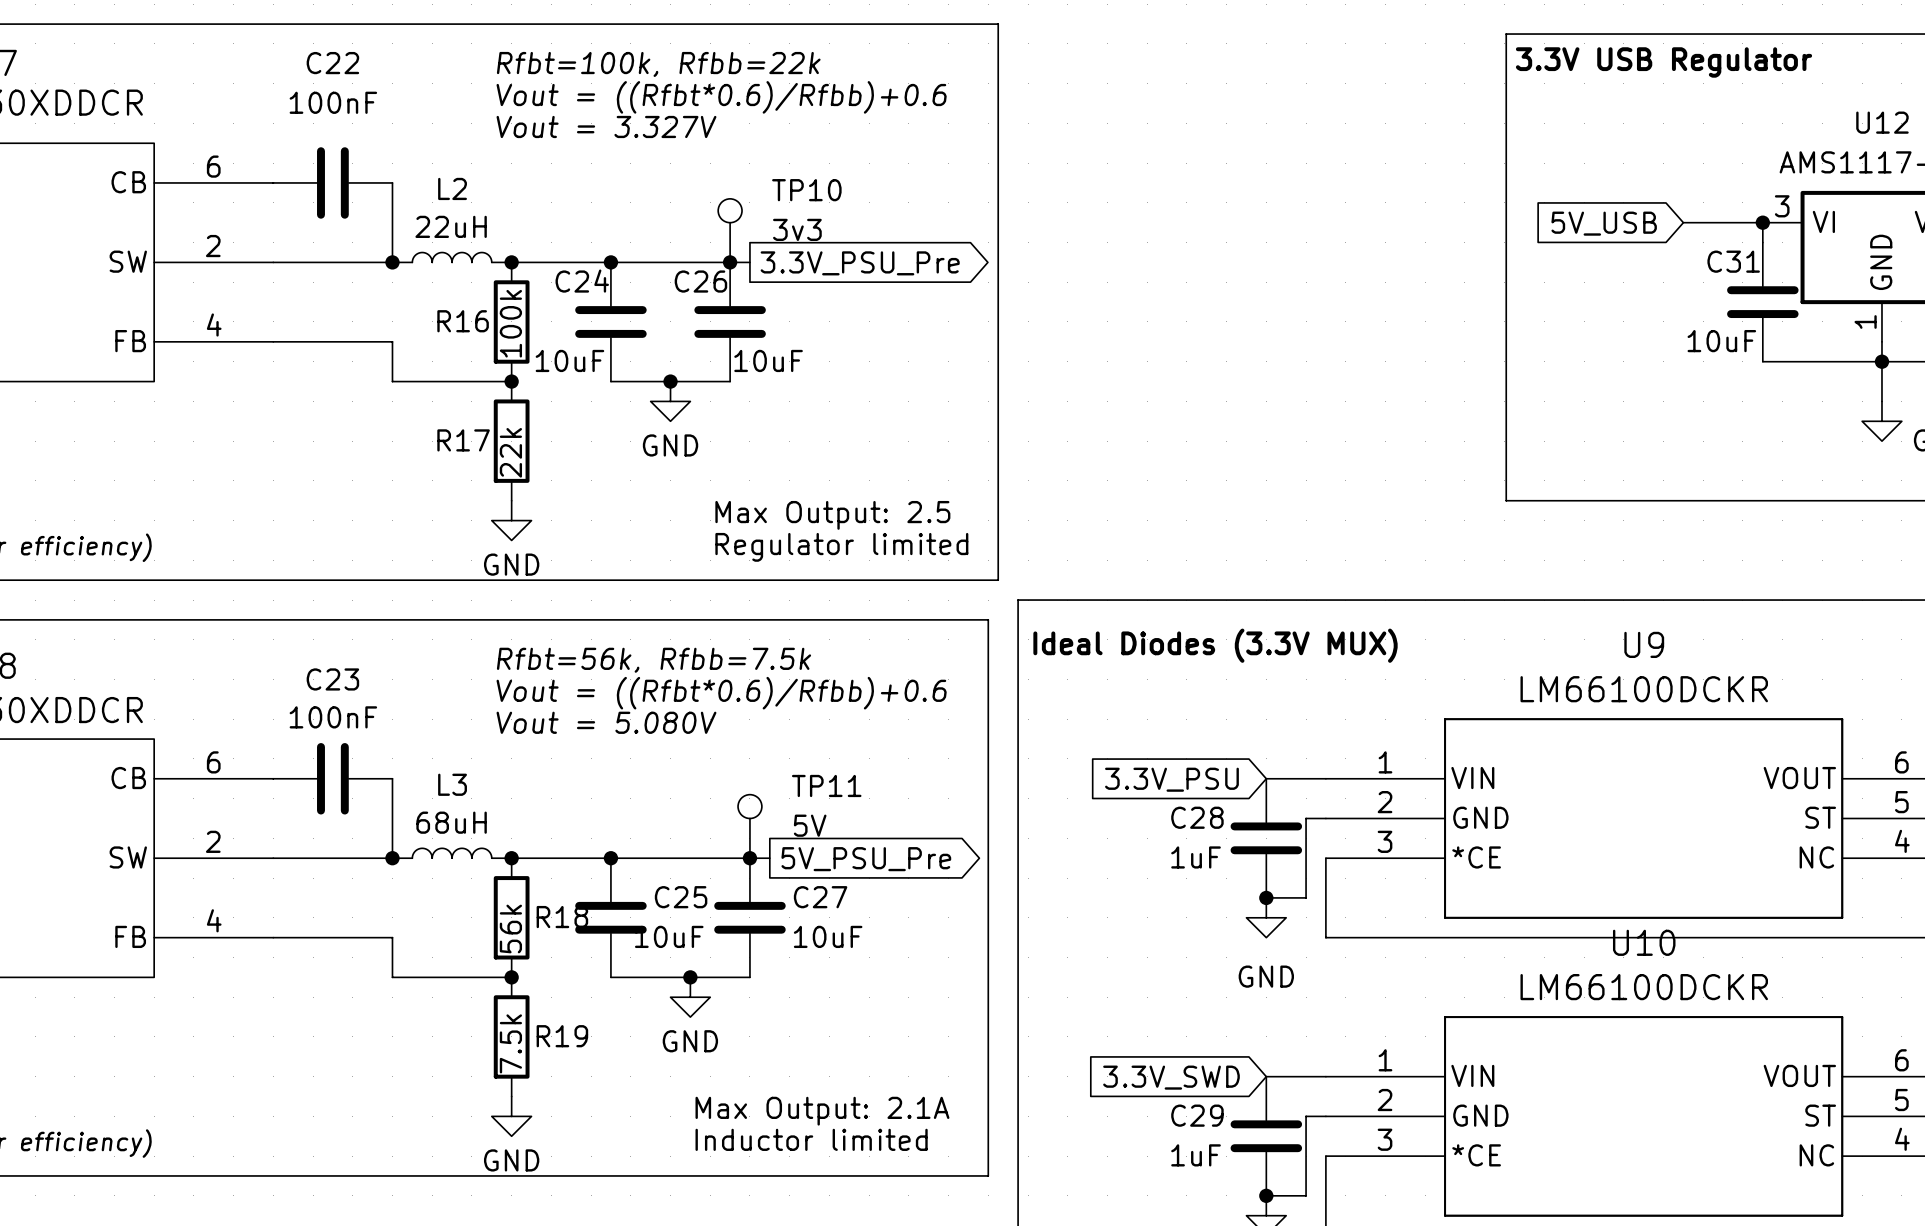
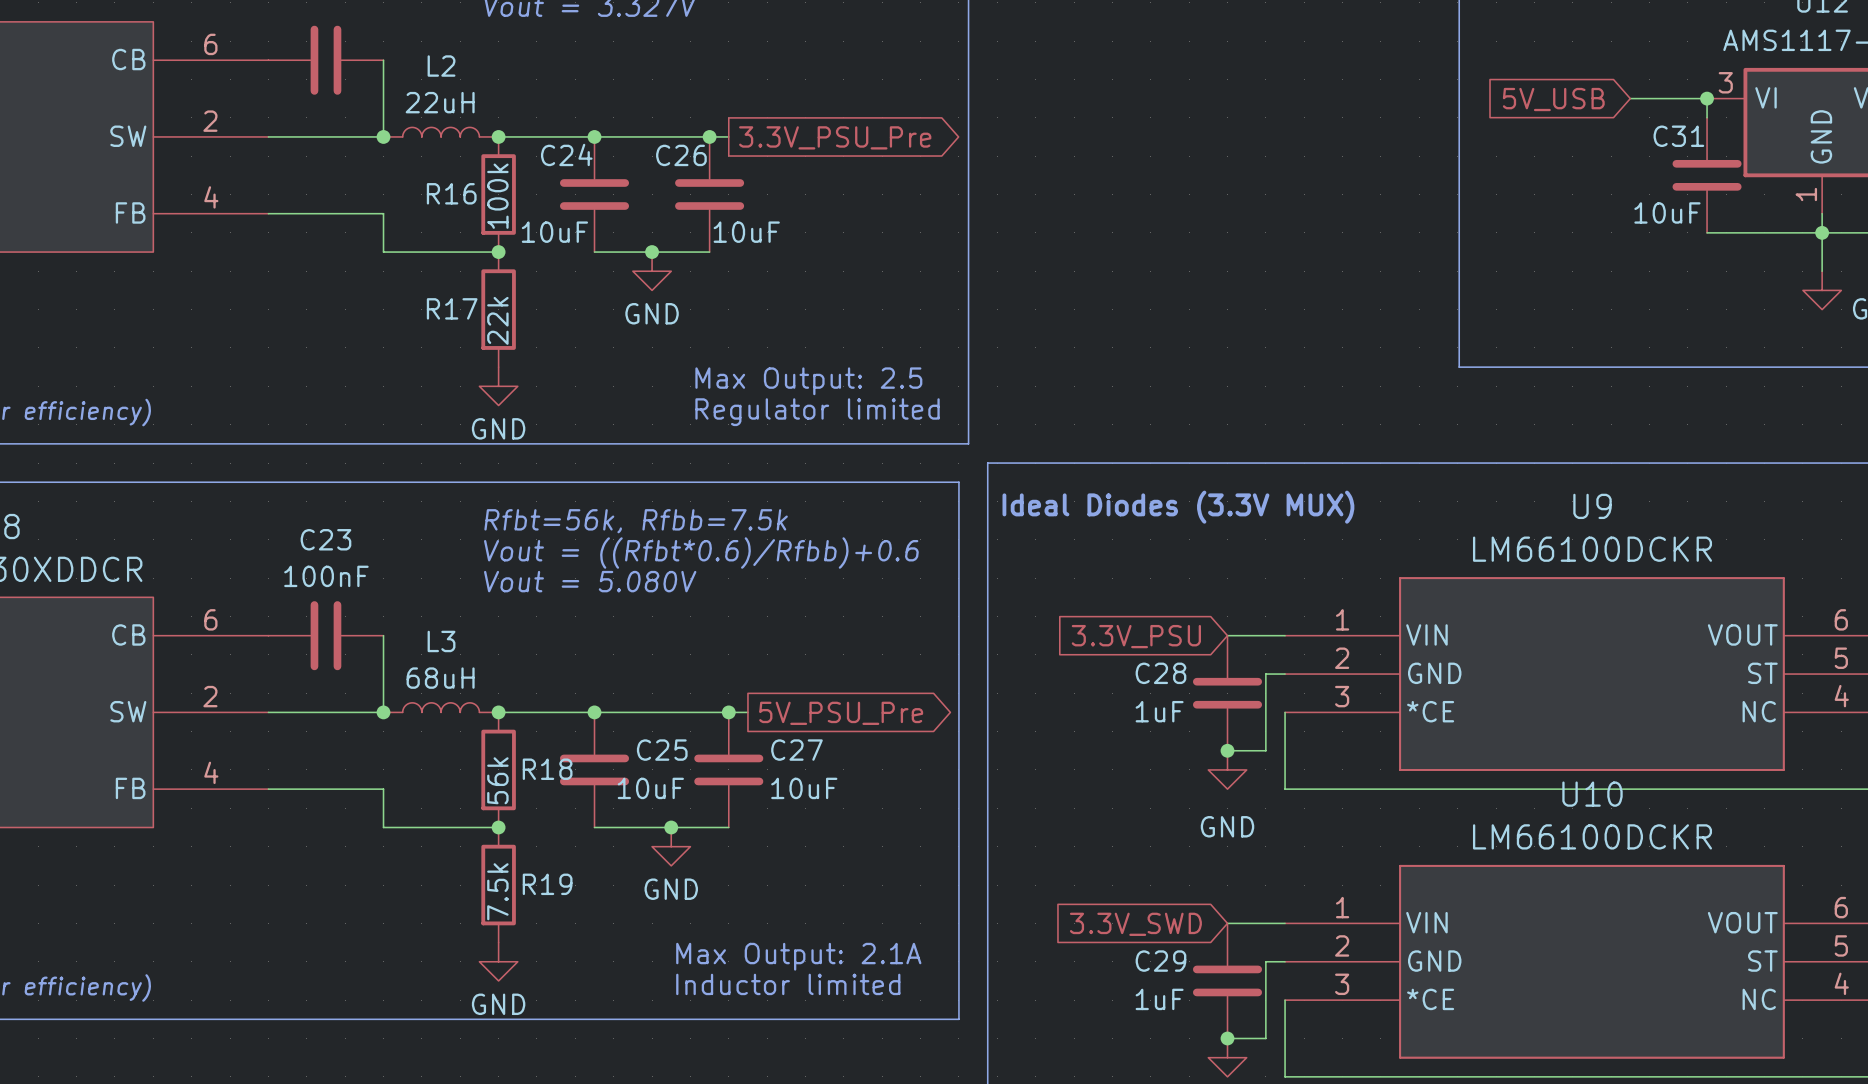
TP10: 3v3 (730, 230) -> none
TP11: 5V (749, 826) -> none

